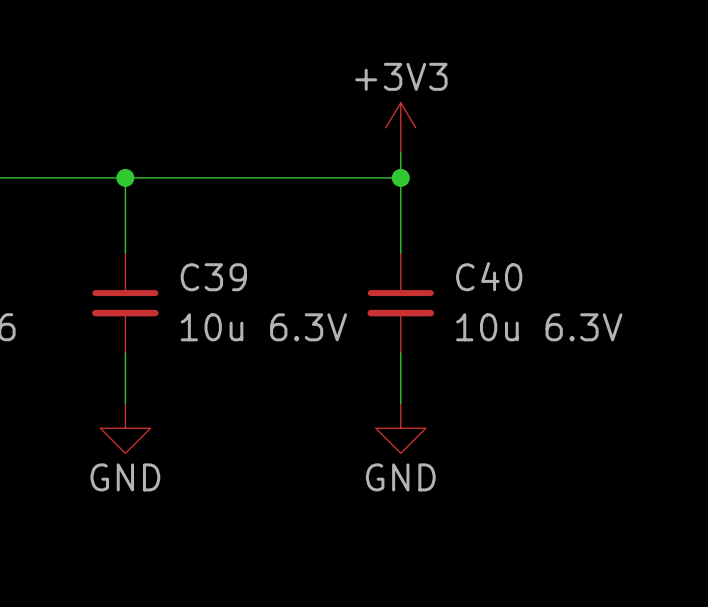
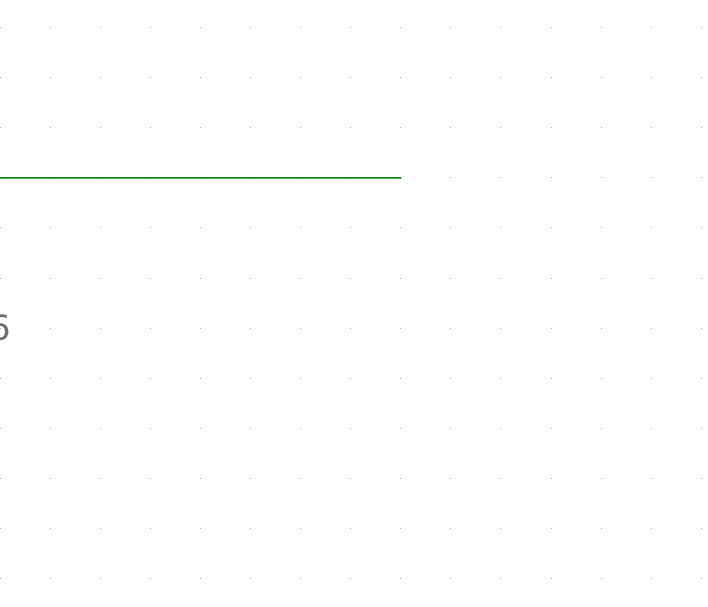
power symbol: +3V3 (400, 127) -> none
wire: (400, 152) (400, 253) -> none
wire: (125, 177) (125, 253) -> none
junction: (125, 177) -> none
junction: (400, 177) -> none
C39: 10u 6.3V (125, 303) -> none
C40: 10u 6.3V (400, 303) -> none
wire: (125, 353) (125, 403) -> none
wire: (400, 353) (400, 403) -> none
power symbol: GND (125, 428) -> none
power symbol: GND (400, 428) -> none

